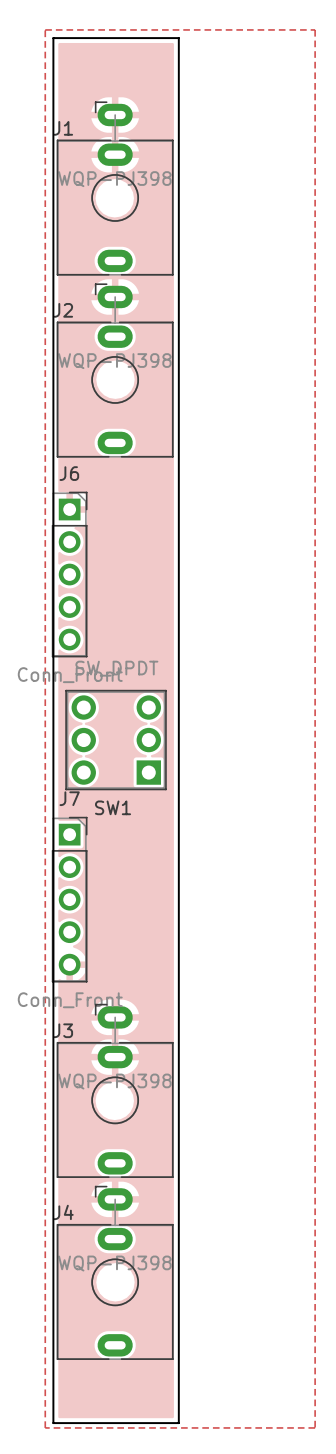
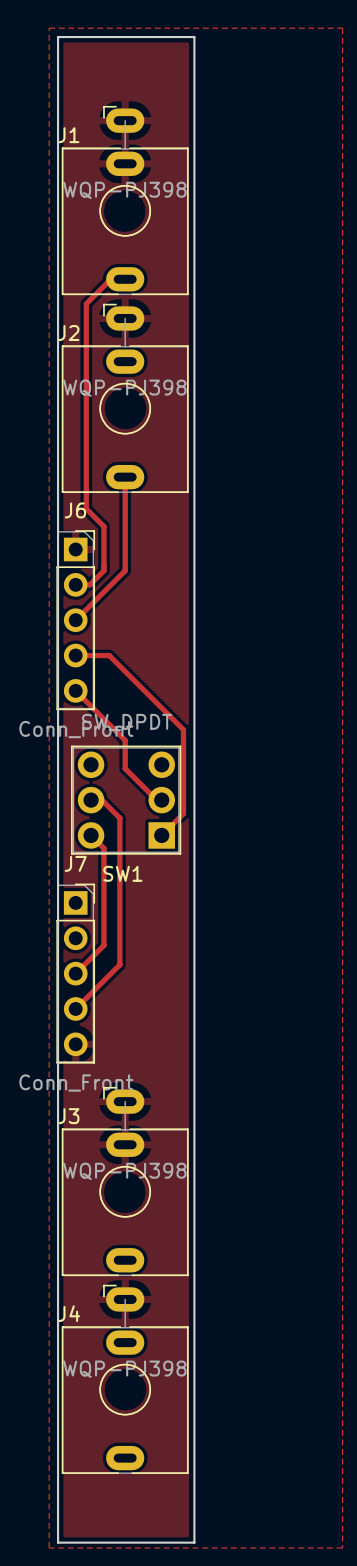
track: none -> (125, 279) (110, 279) (86, 303) (86, 508) (103, 526) (103, 570) (89, 584) (75, 584)
track: none -> (125, 477) (125, 570) (75, 620)
track: none -> (75, 655) (109, 655) (183, 729) (183, 813) (161, 835)
track: none -> (75, 690) (125, 740) (125, 768) (156, 800) (161, 800)
track: none -> (91, 800) (101, 800) (119, 818) (119, 964) (75, 1008)
track: none -> (91, 835) (103, 848) (103, 945) (75, 973)

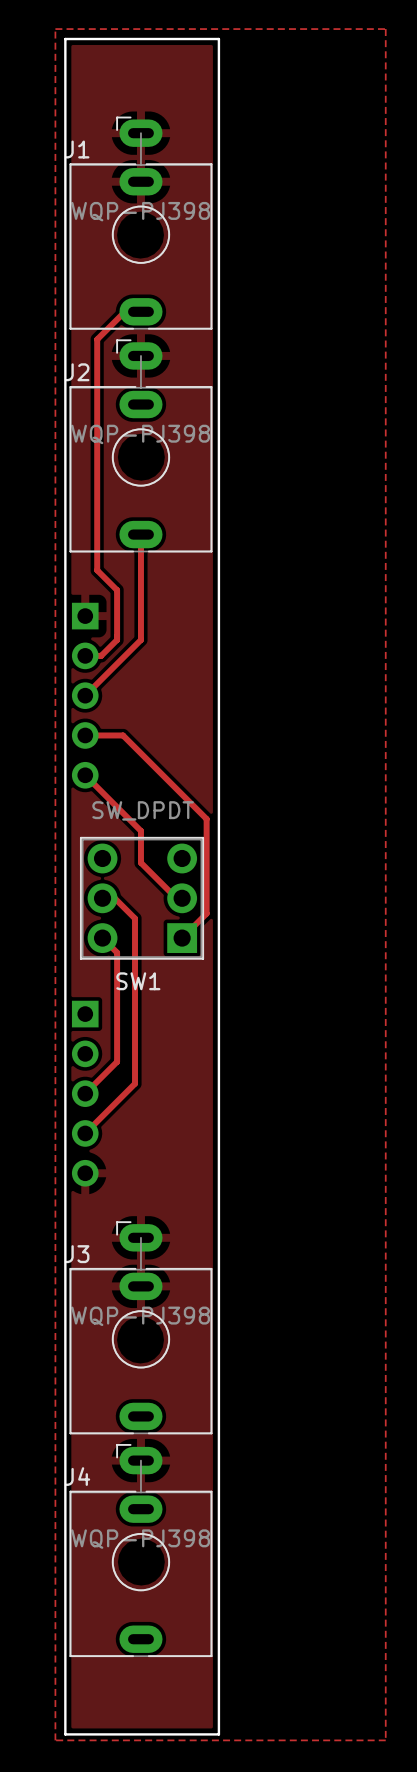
J6 side: top (75, 620) -> bottom (85, 695)
J7 side: top (75, 973) -> bottom (85, 1093)

